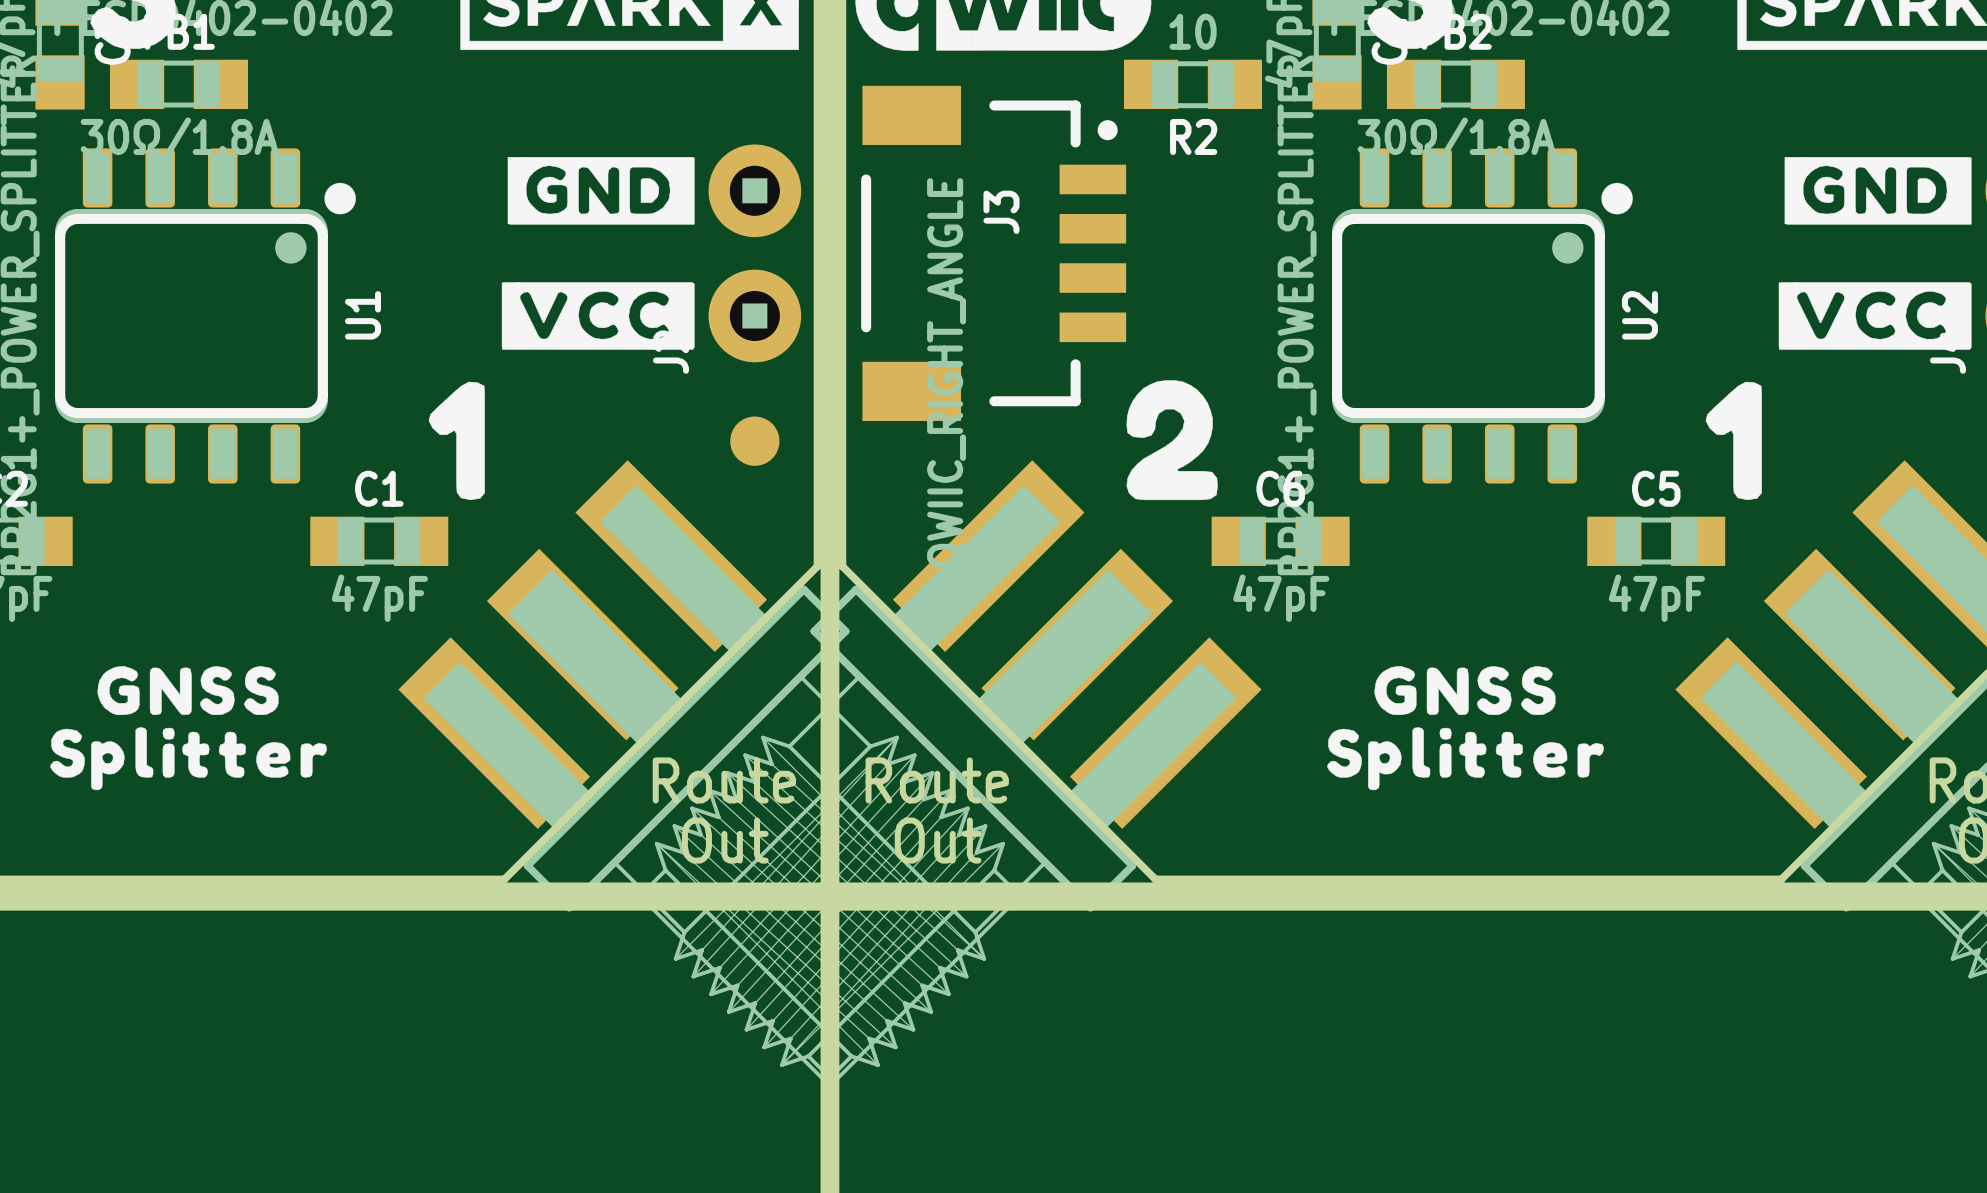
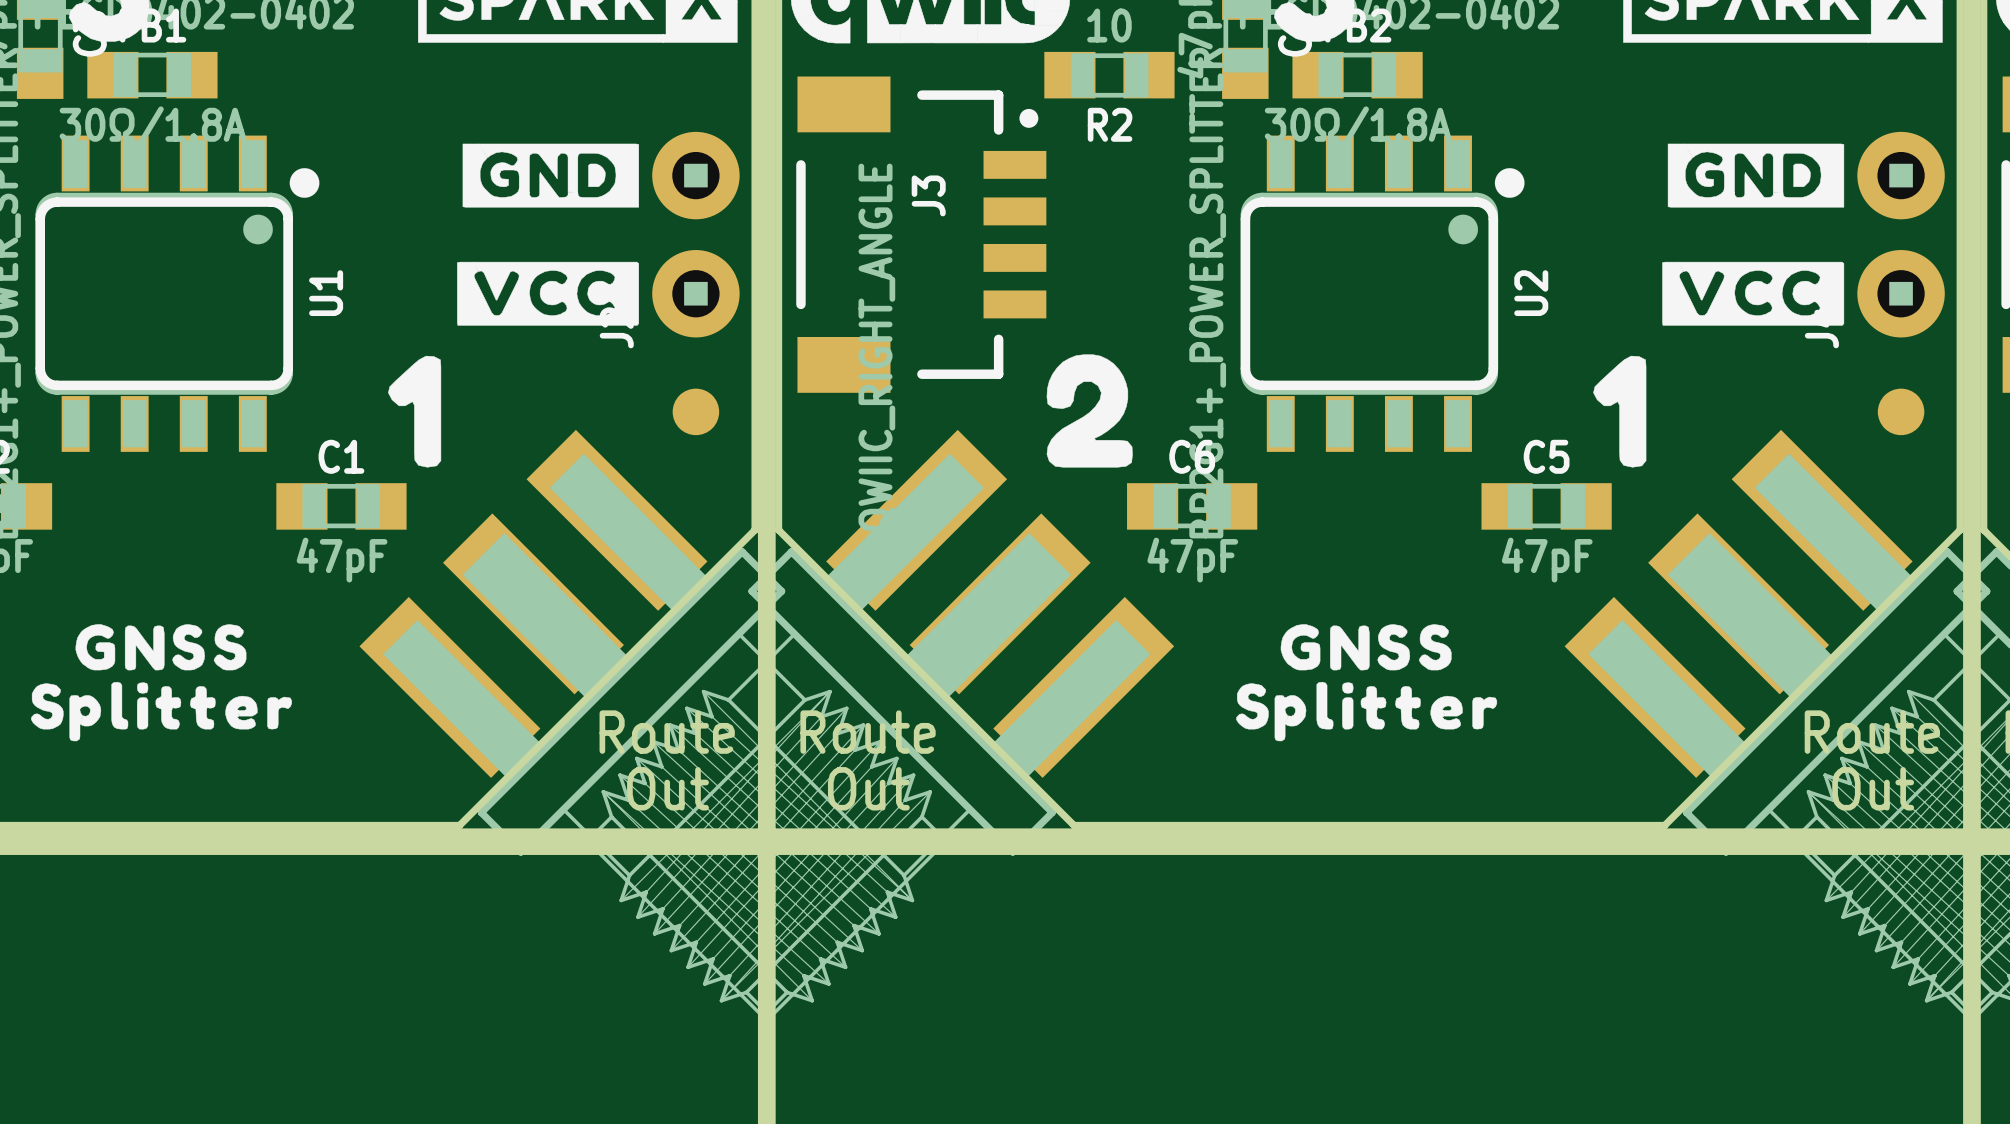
U1 footprint: [55, 148, 356, 484] -> [35, 135, 320, 452]
U2 footprint: [1332, 148, 1633, 484] -> [1240, 135, 1525, 452]

